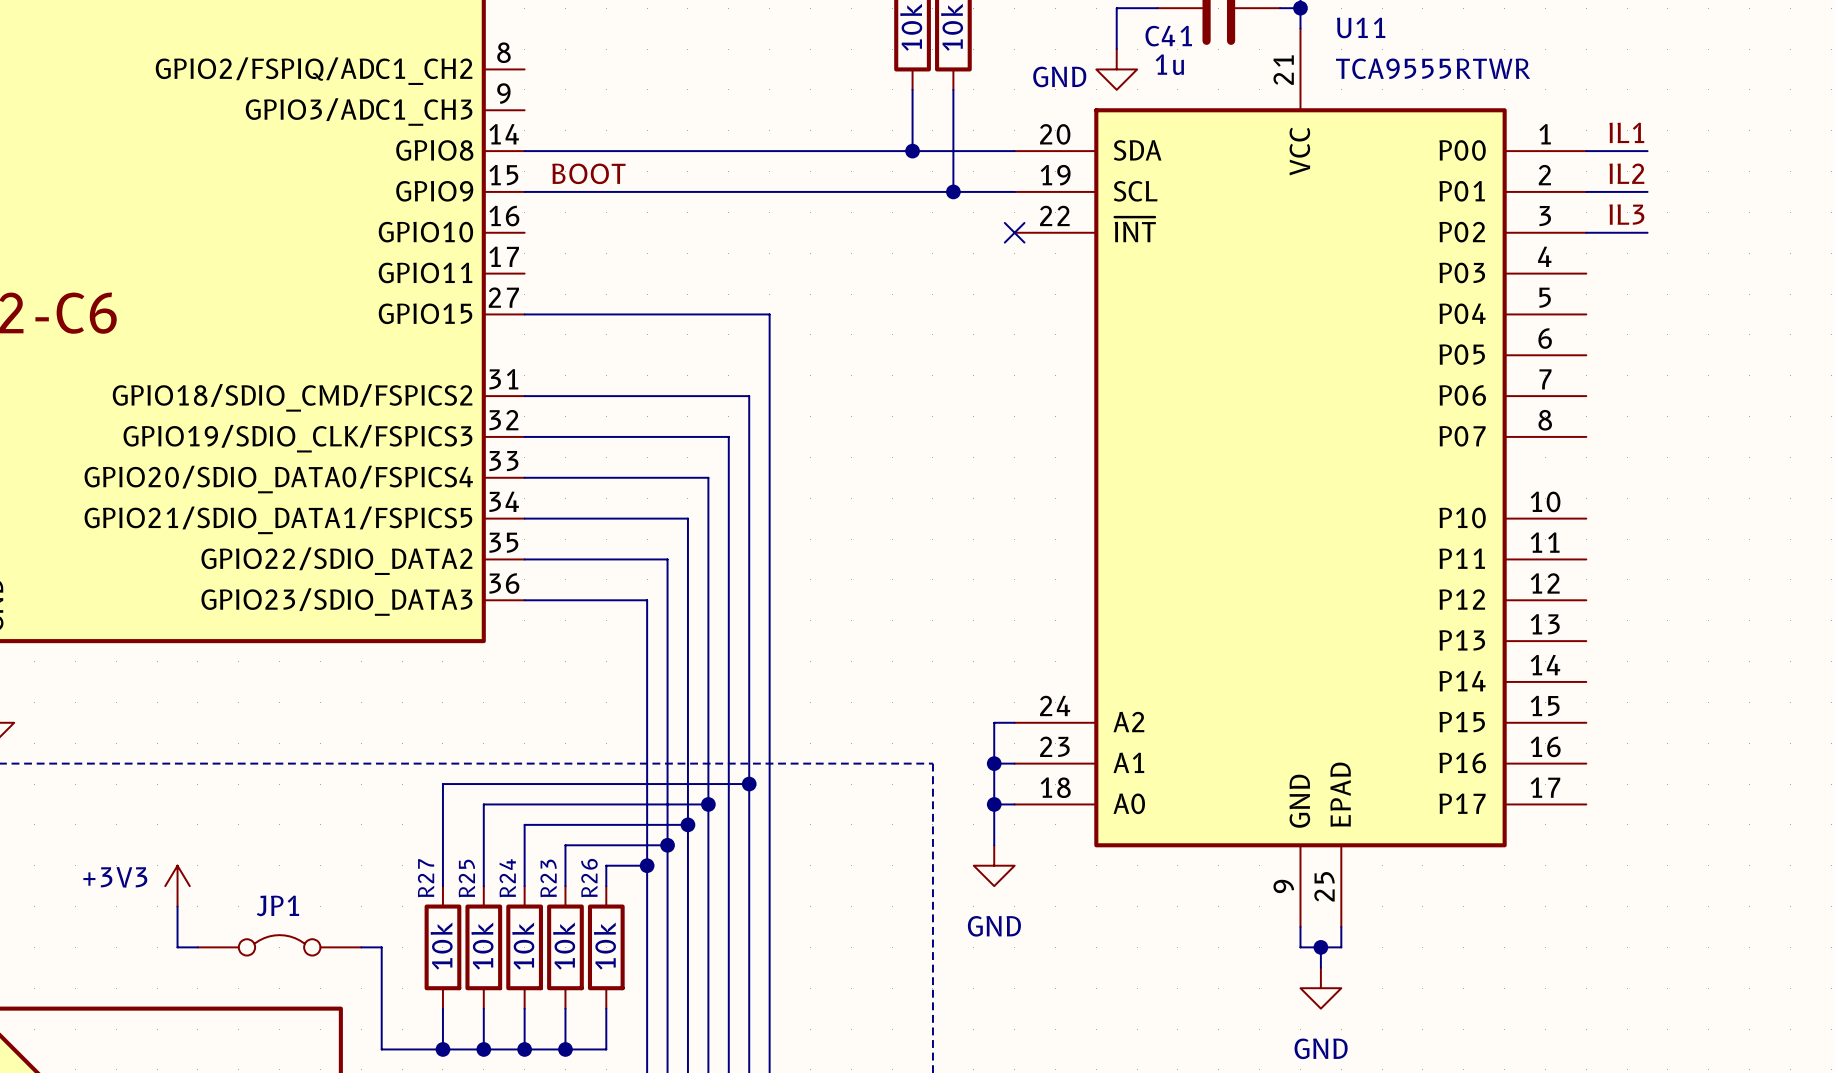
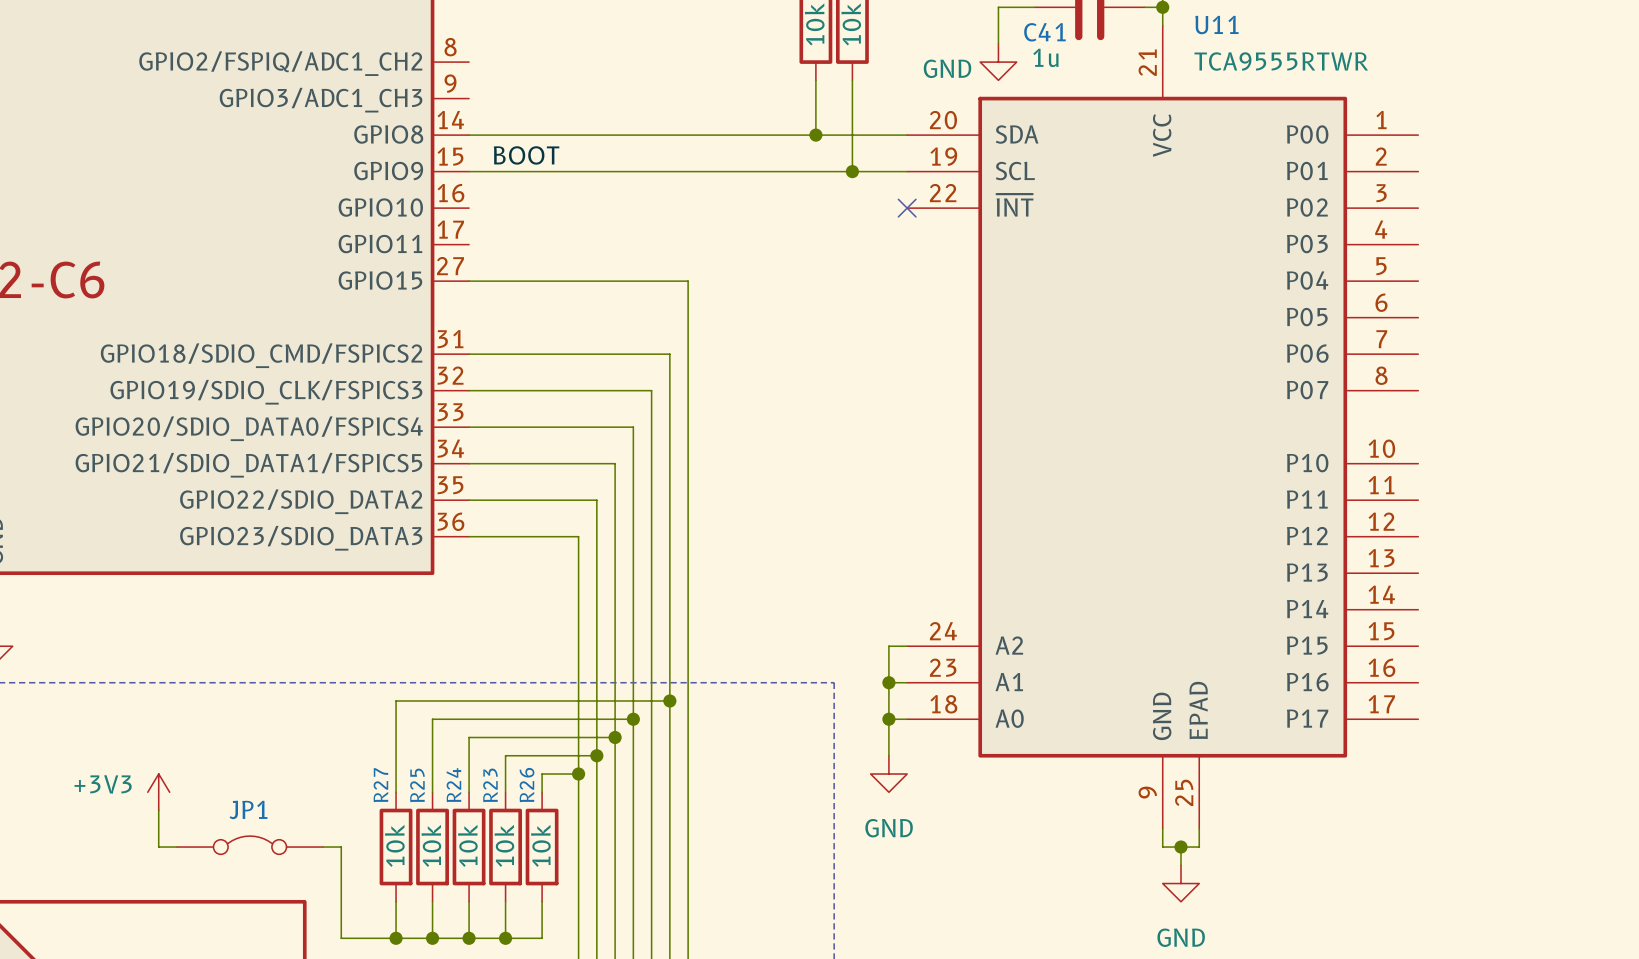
label: IL1 (1626, 132) -> none
wire: (1586, 151) (1647, 151) -> none
label: IL2 (1626, 173) -> none
wire: (1586, 191) (1647, 191) -> none
label: IL3 (1626, 214) -> none
wire: (1586, 232) (1647, 232) -> none

